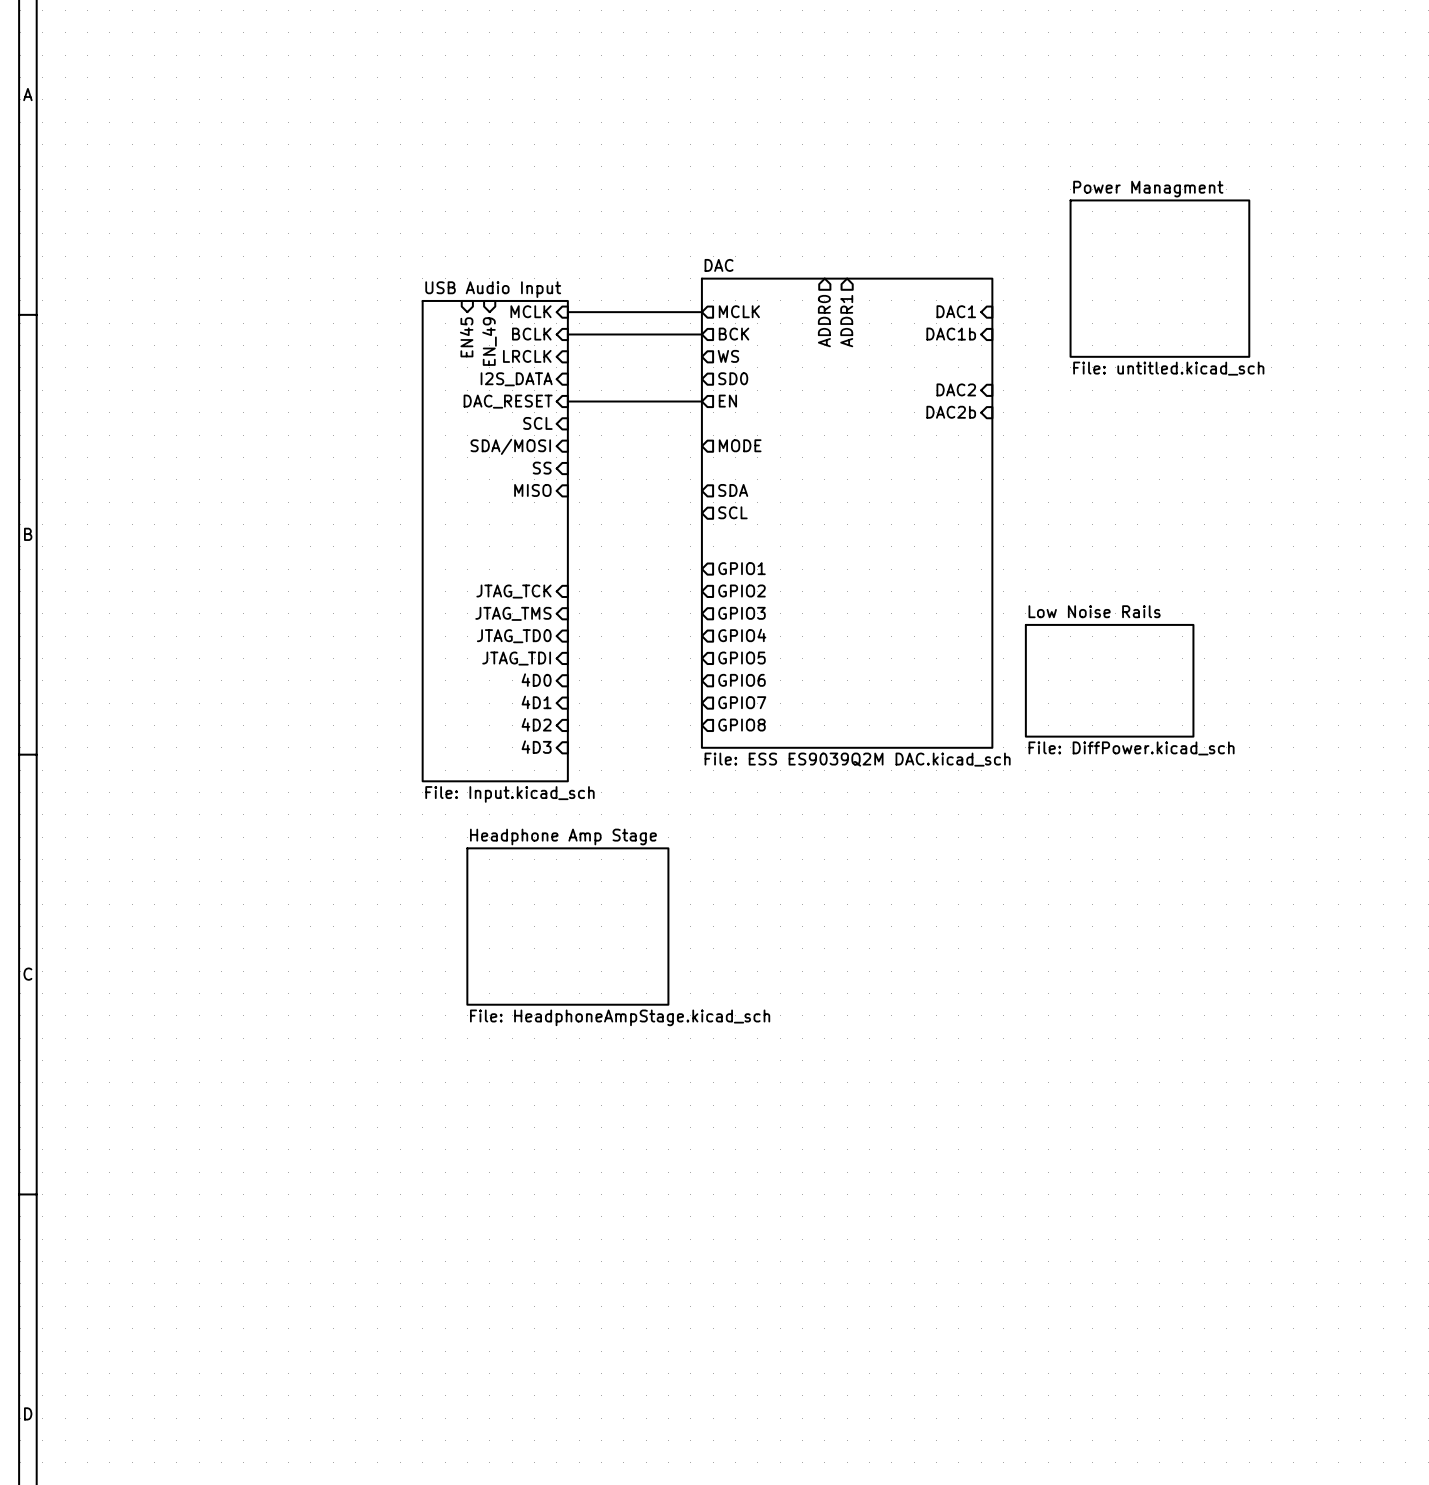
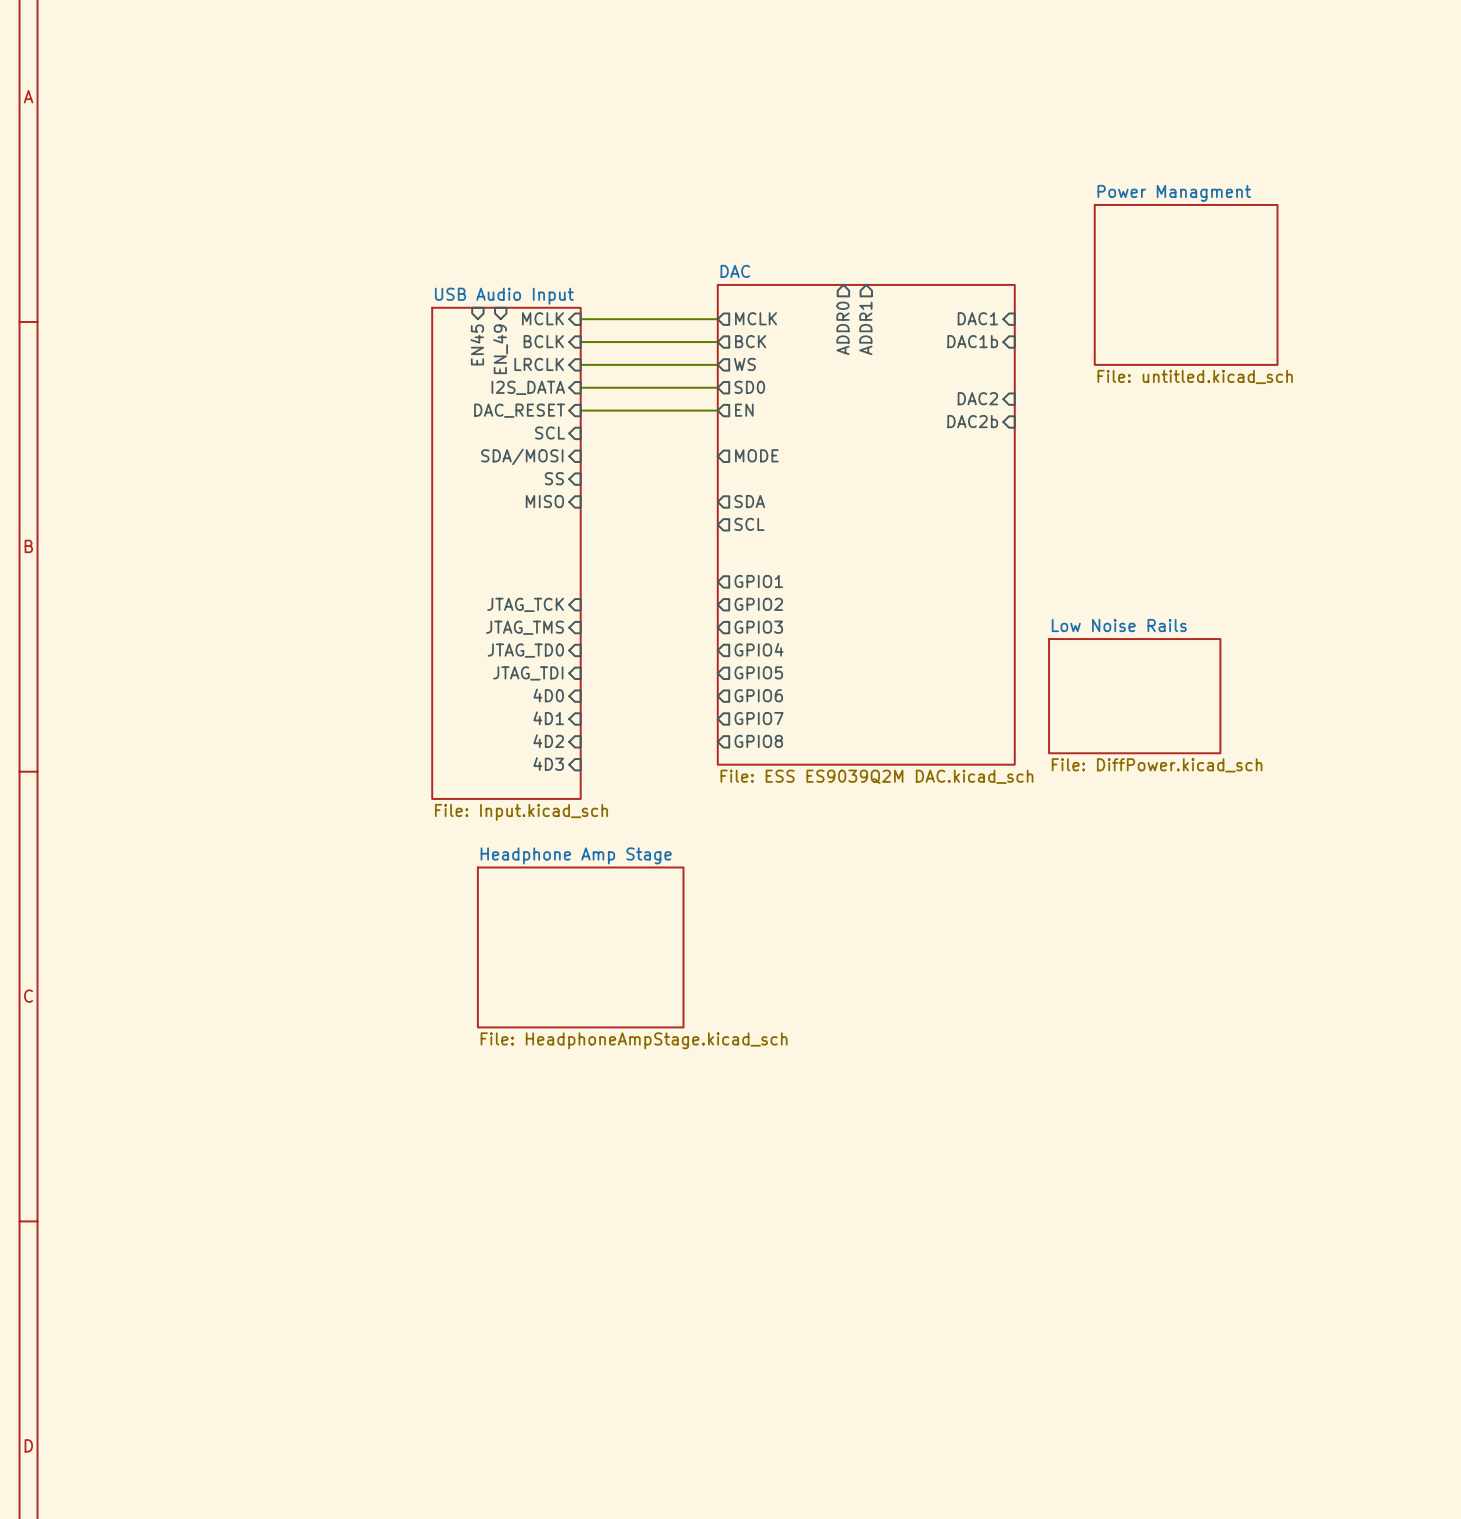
wire: none -> (580, 364) (717, 364)
wire: none -> (580, 387) (717, 387)

